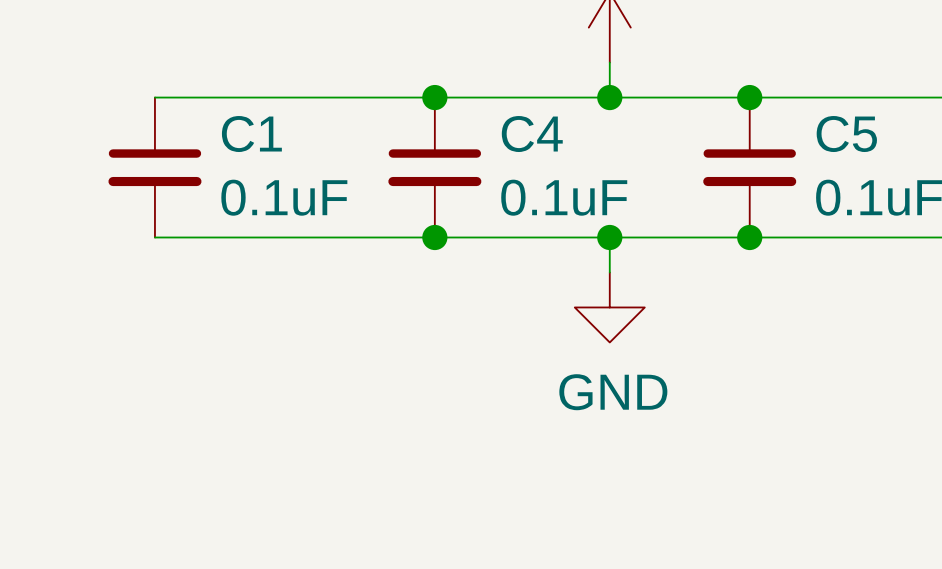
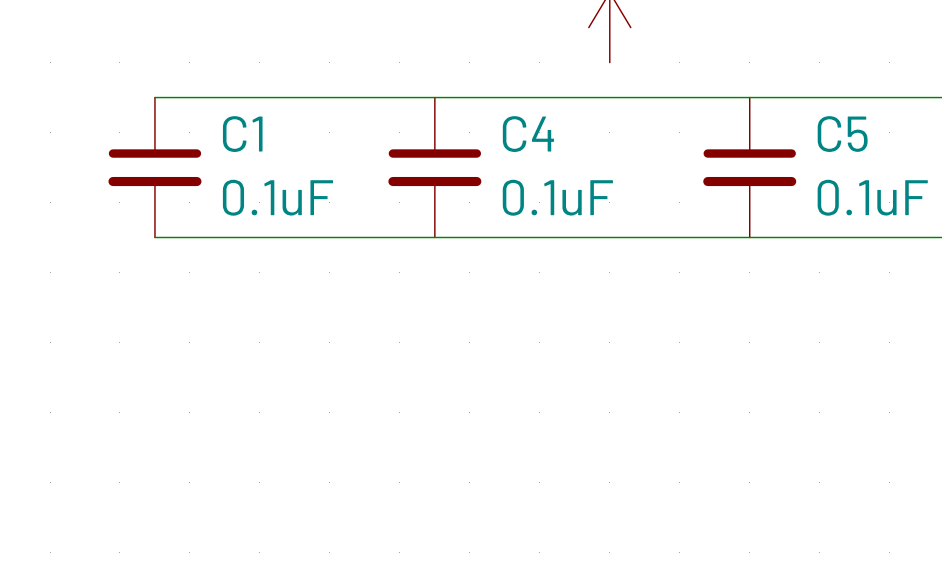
wire: (609, 62) (609, 97) -> none
junction: (434, 97) -> none
junction: (609, 97) -> none
junction: (749, 97) -> none
junction: (434, 237) -> none
wire: (609, 237) (609, 272) -> none
junction: (609, 237) -> none
junction: (749, 237) -> none
power symbol: GND (609, 307) -> none

